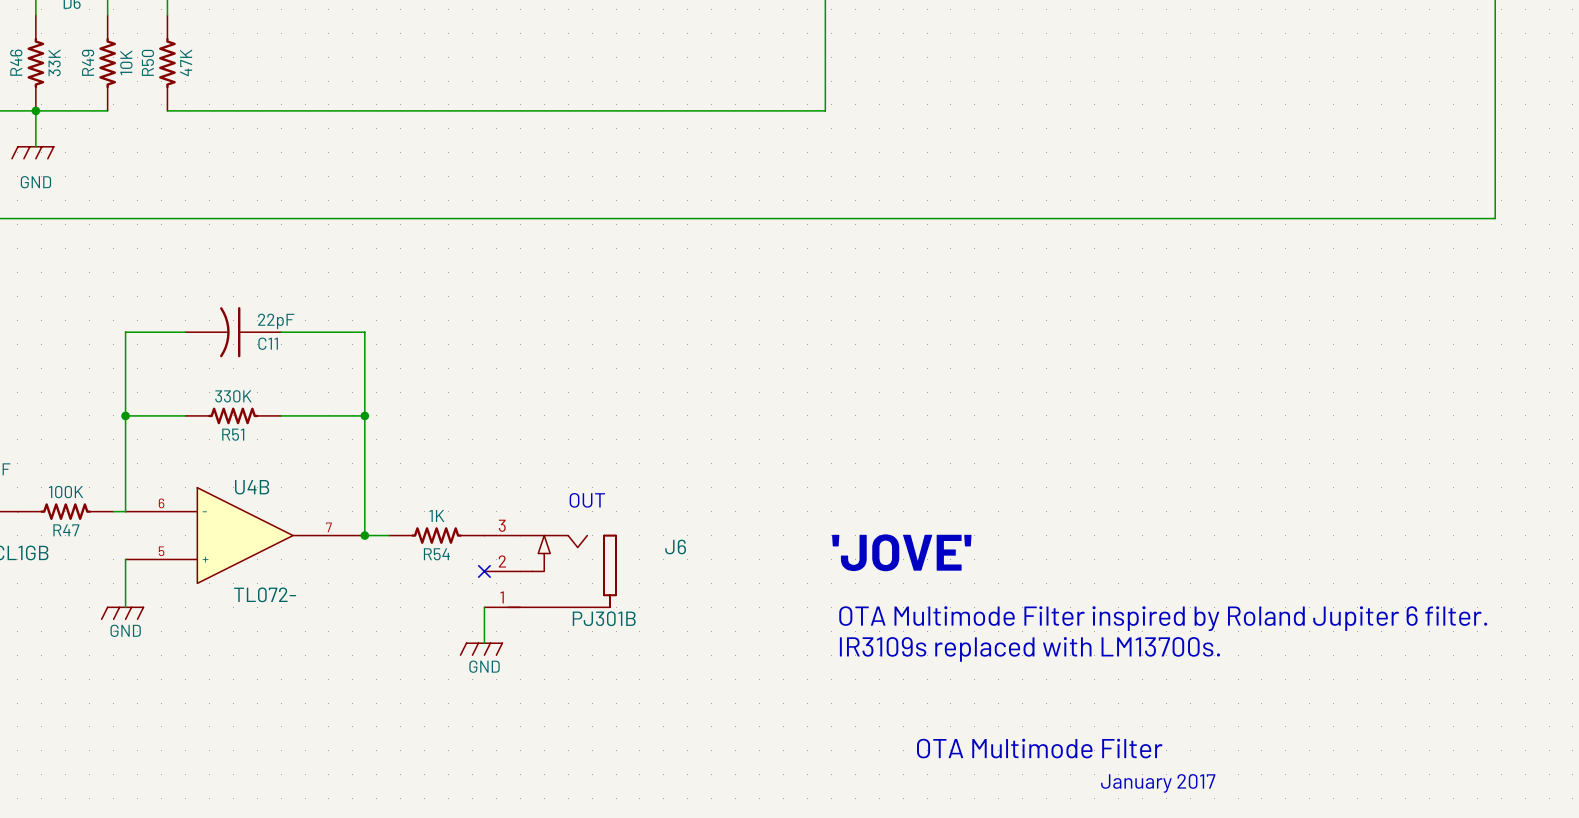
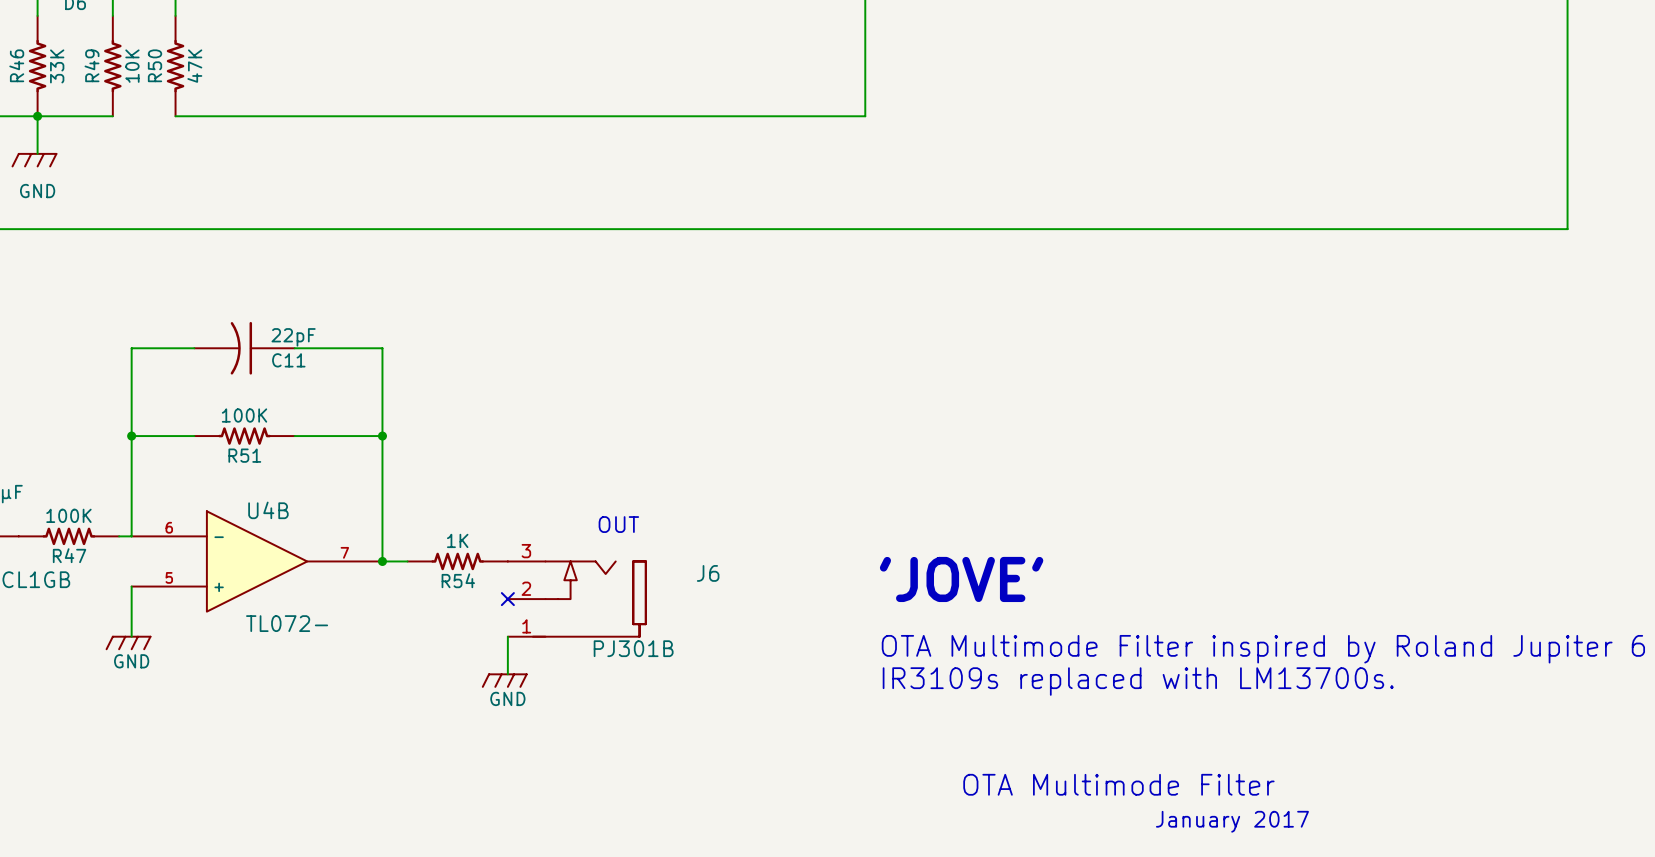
R51 value: 330K (233, 396) -> 100K (244, 415)

